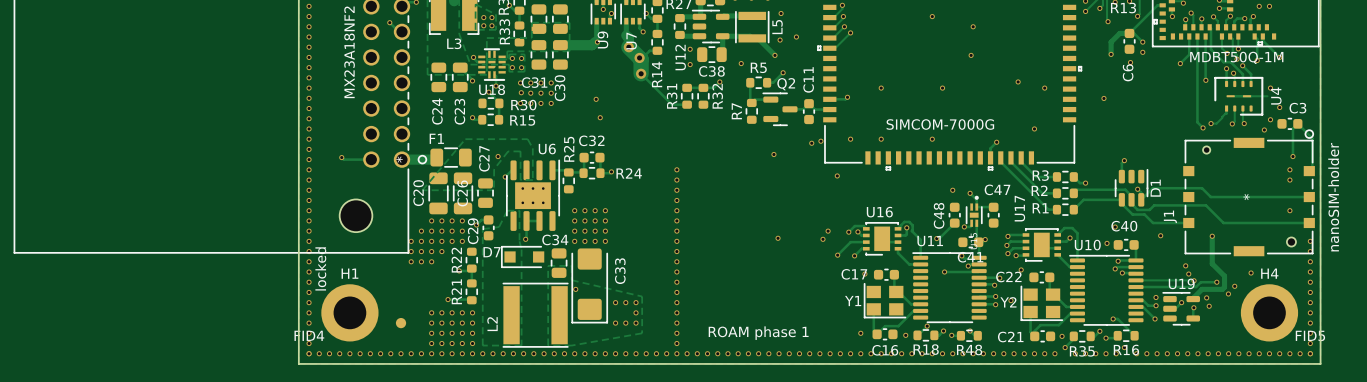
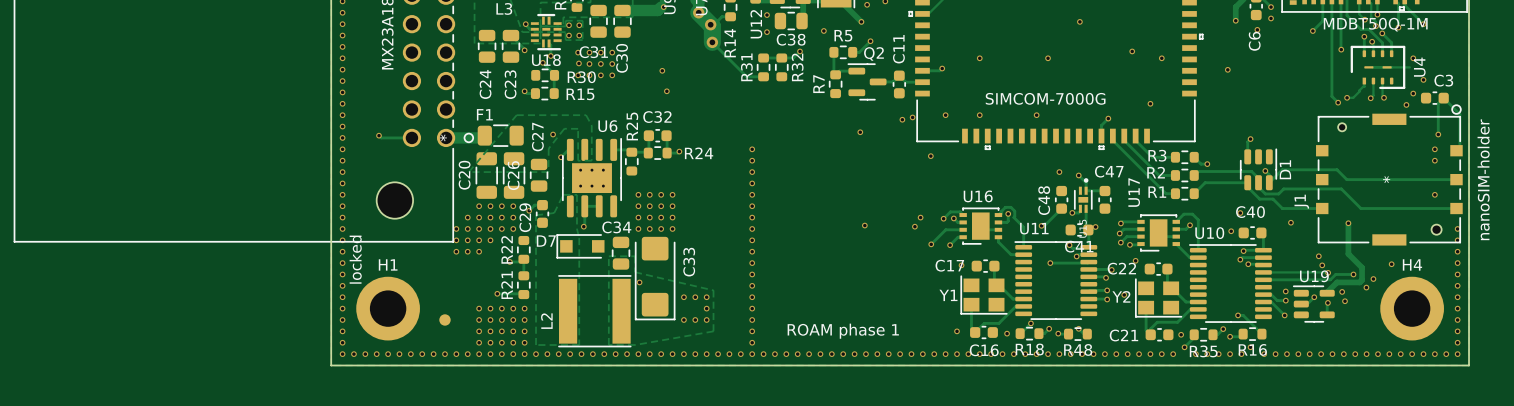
FID4: (309, 353) -> none
FID5: (1310, 353) -> none

